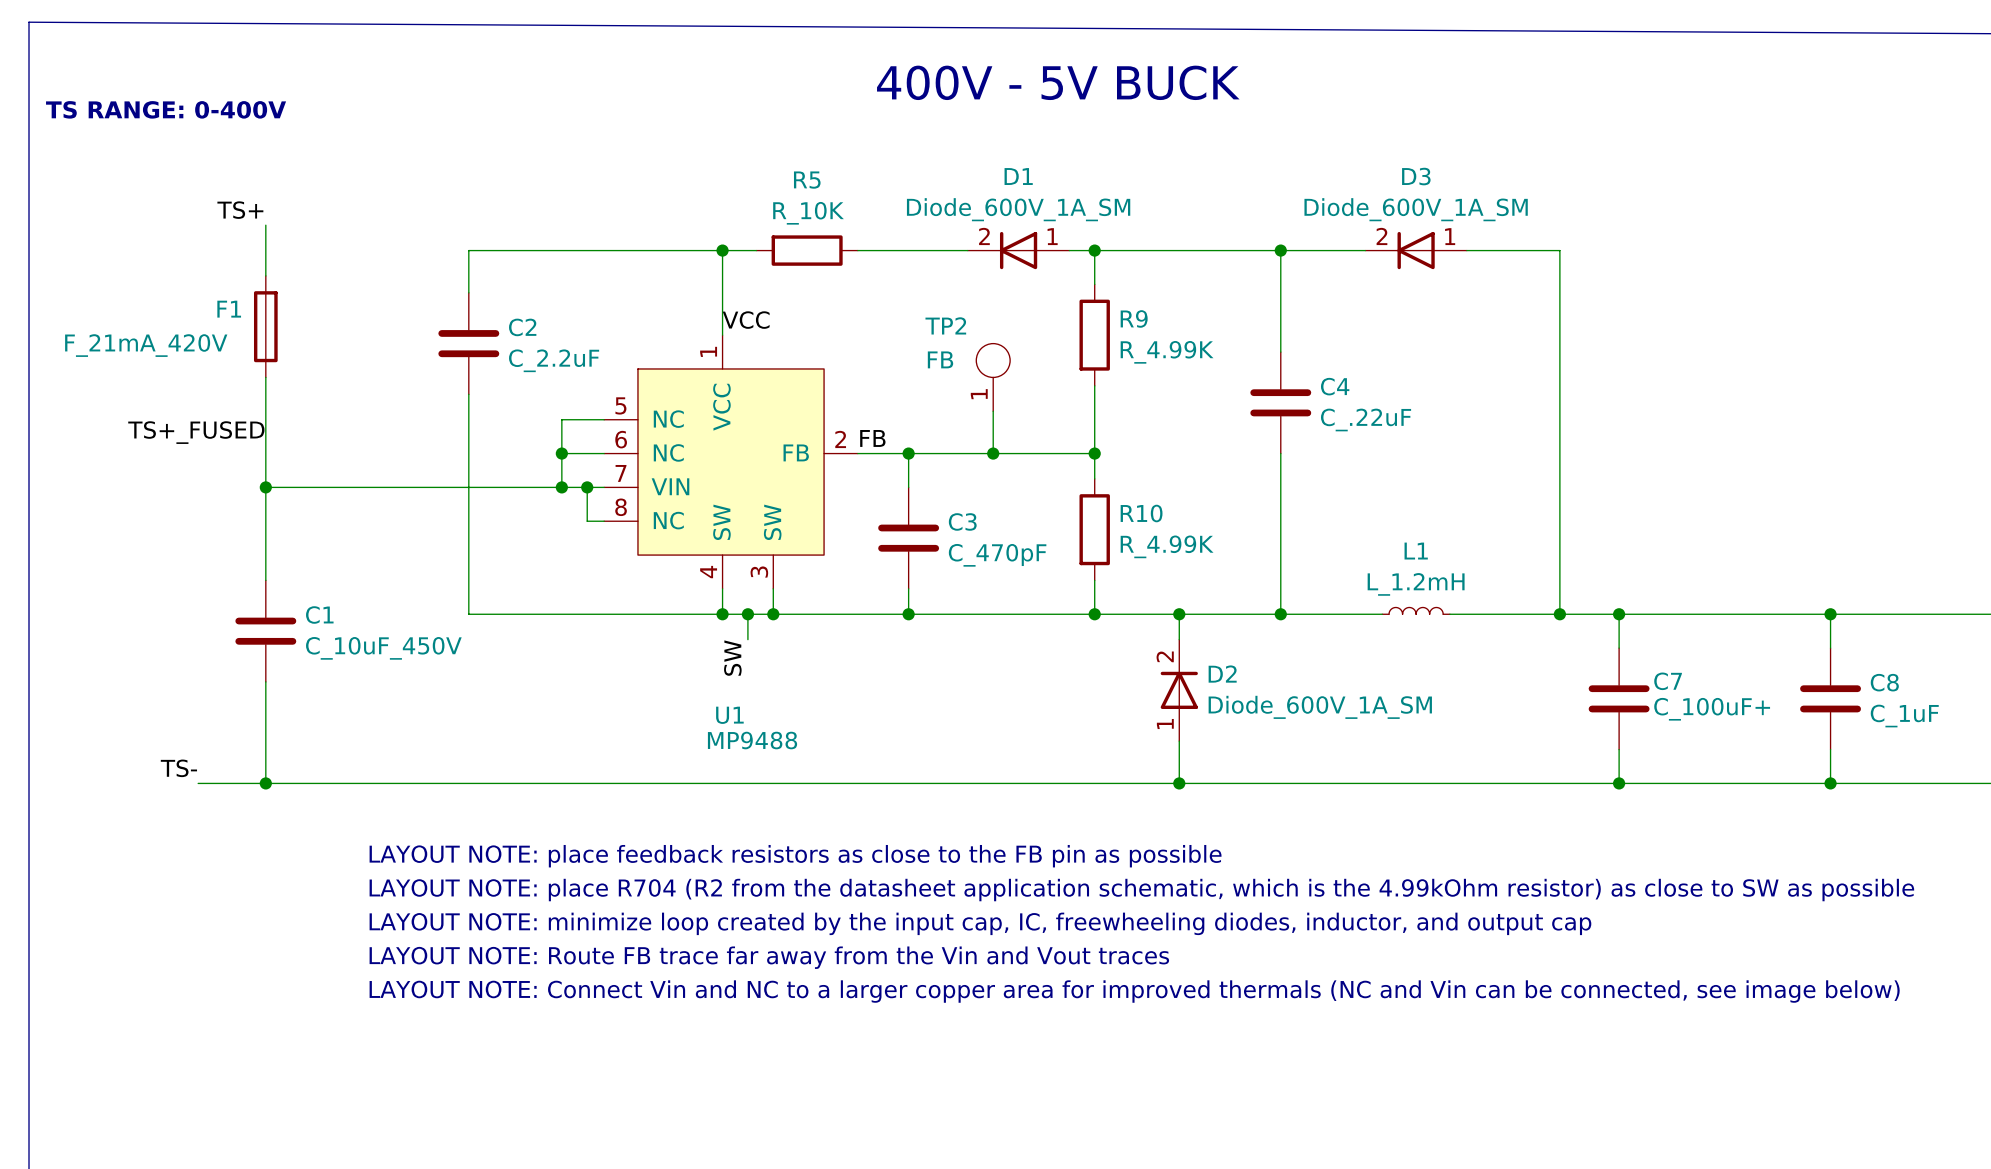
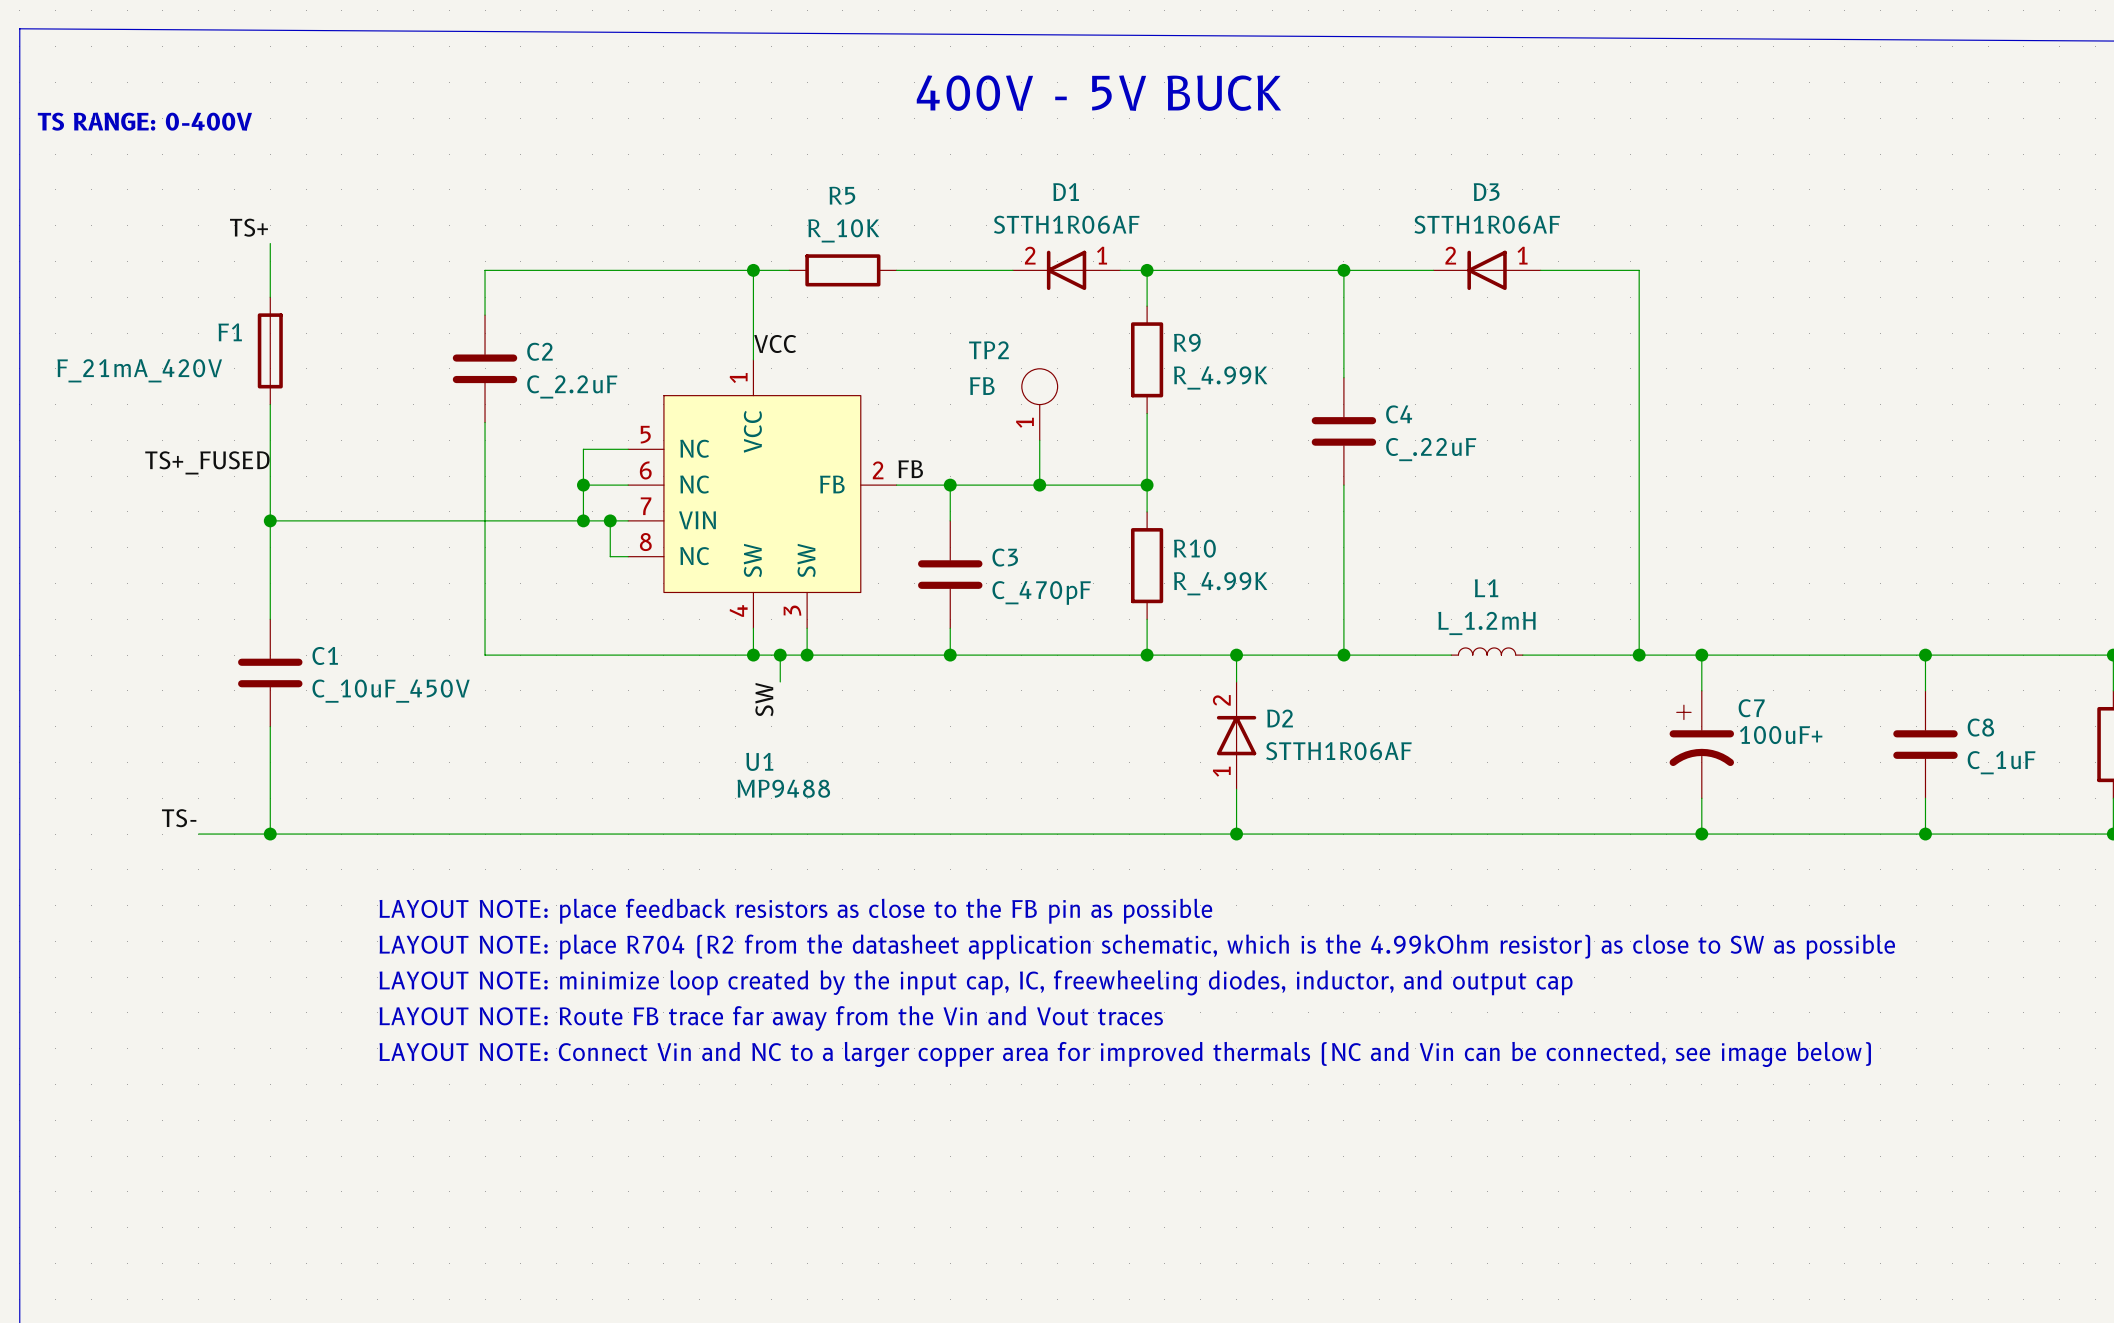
D1 value: Diode_600V_1A_SM (1018, 209) -> STTH1R06AF (1066, 224)
D3 value: Diode_600V_1A_SM (1416, 209) -> STTH1R06AF (1487, 224)
C7 symbol: [1588, 648, 1650, 750] -> [1669, 690, 1735, 799]
D2 value: Diode_600V_1A_SM (1320, 707) -> STTH1R06AF (1338, 751)
C7 value: C_100uF+ (1712, 709) -> 100uF+ (1781, 735)

